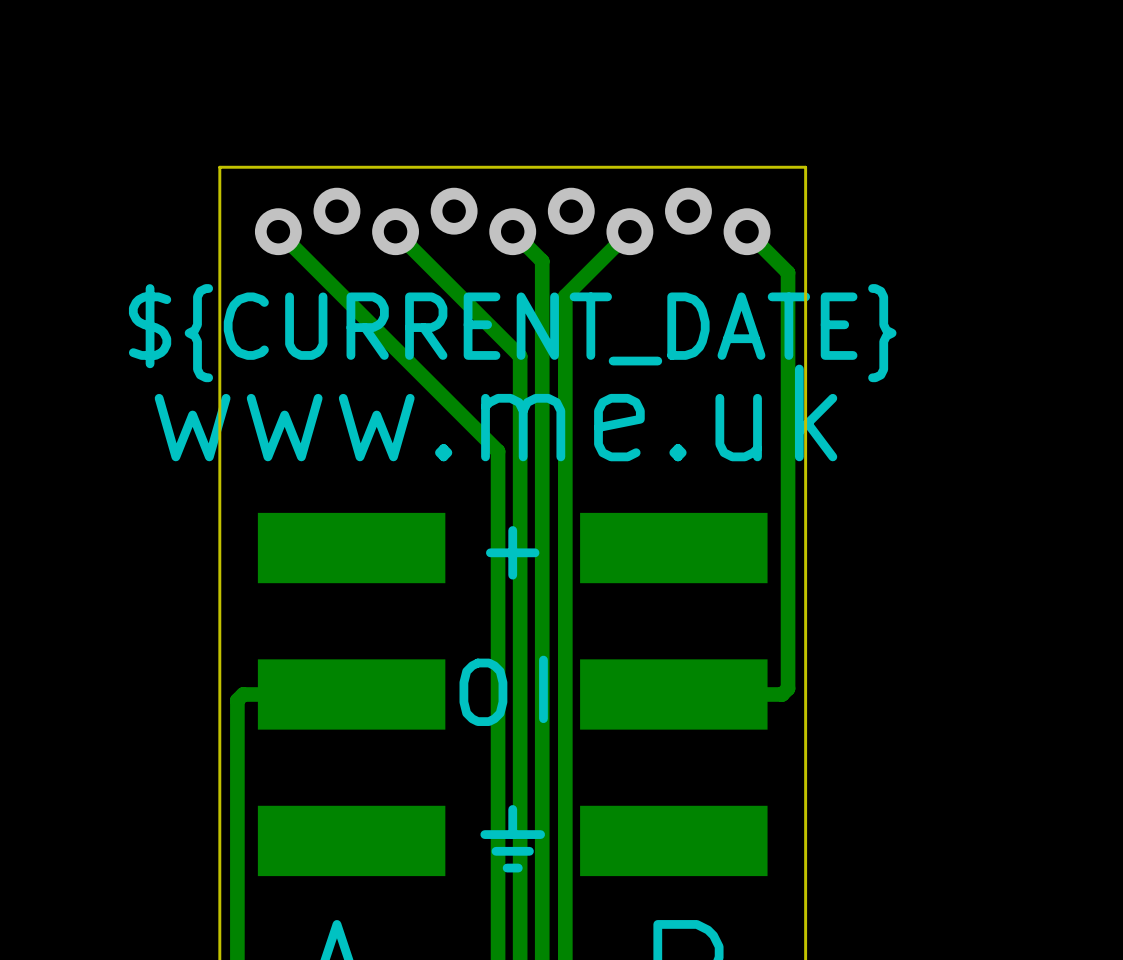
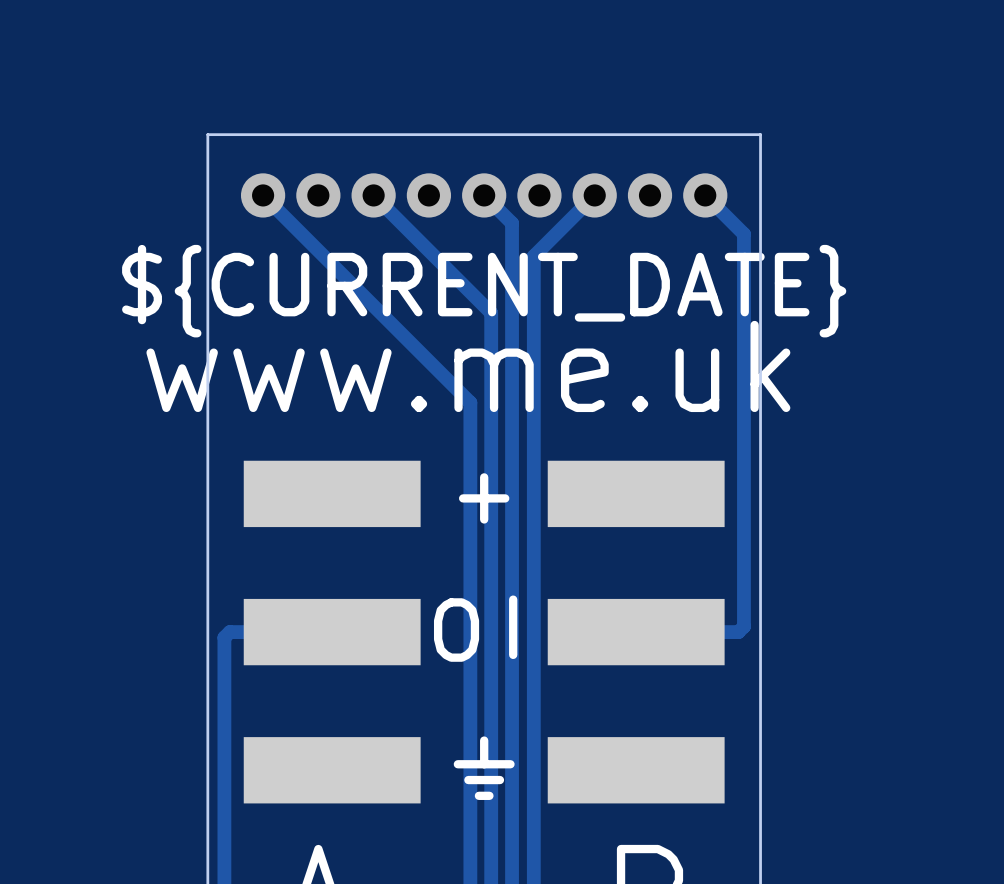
via position: (336, 211) -> (318, 195)
via position: (454, 211) -> (428, 195)
via position: (571, 211) -> (539, 195)
via position: (688, 211) -> (649, 195)

